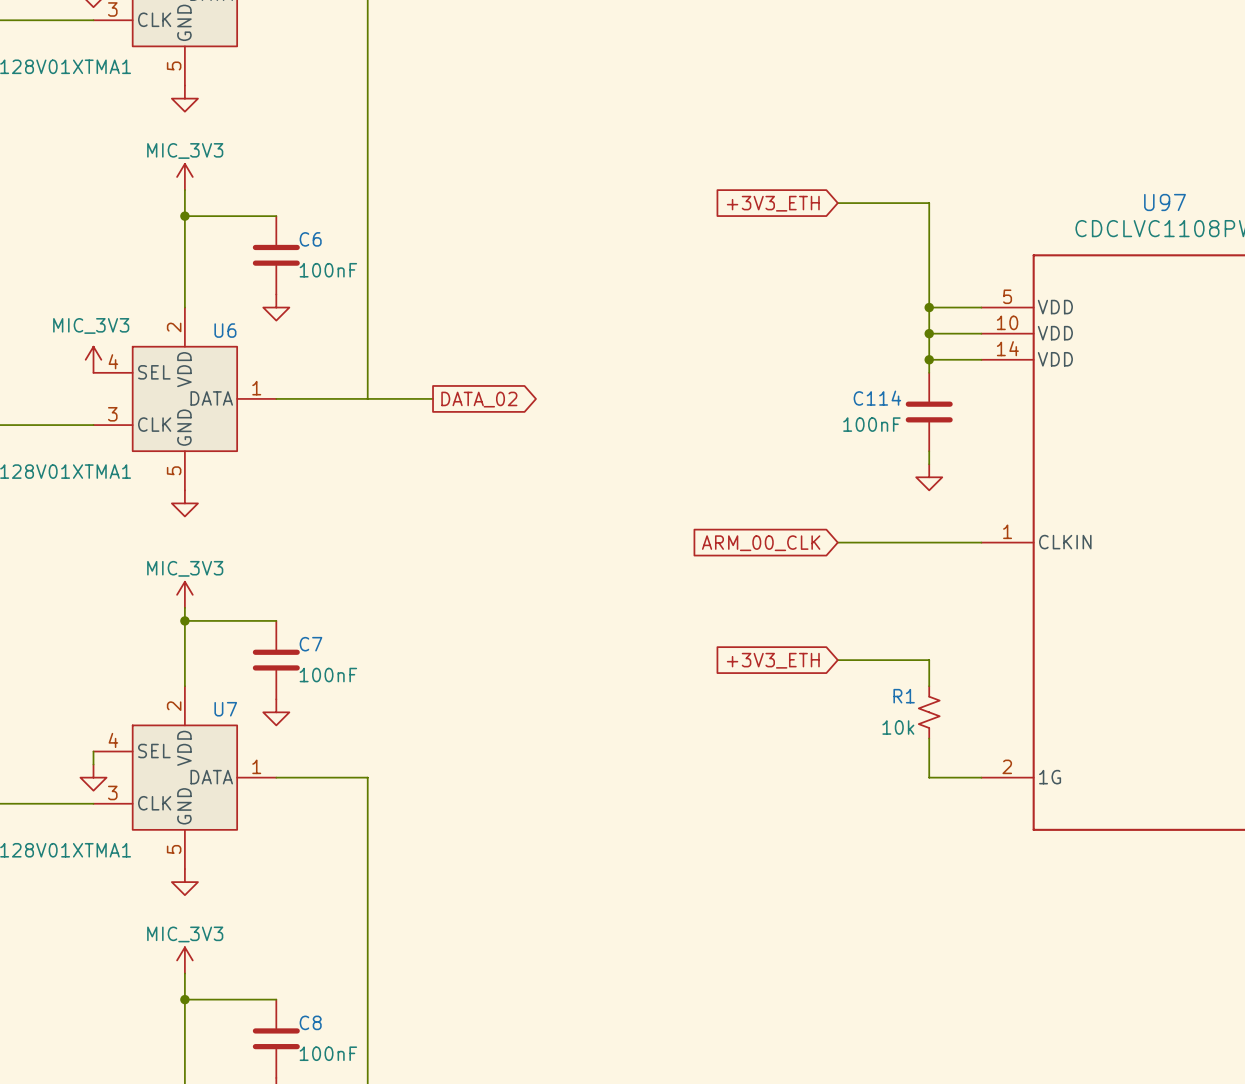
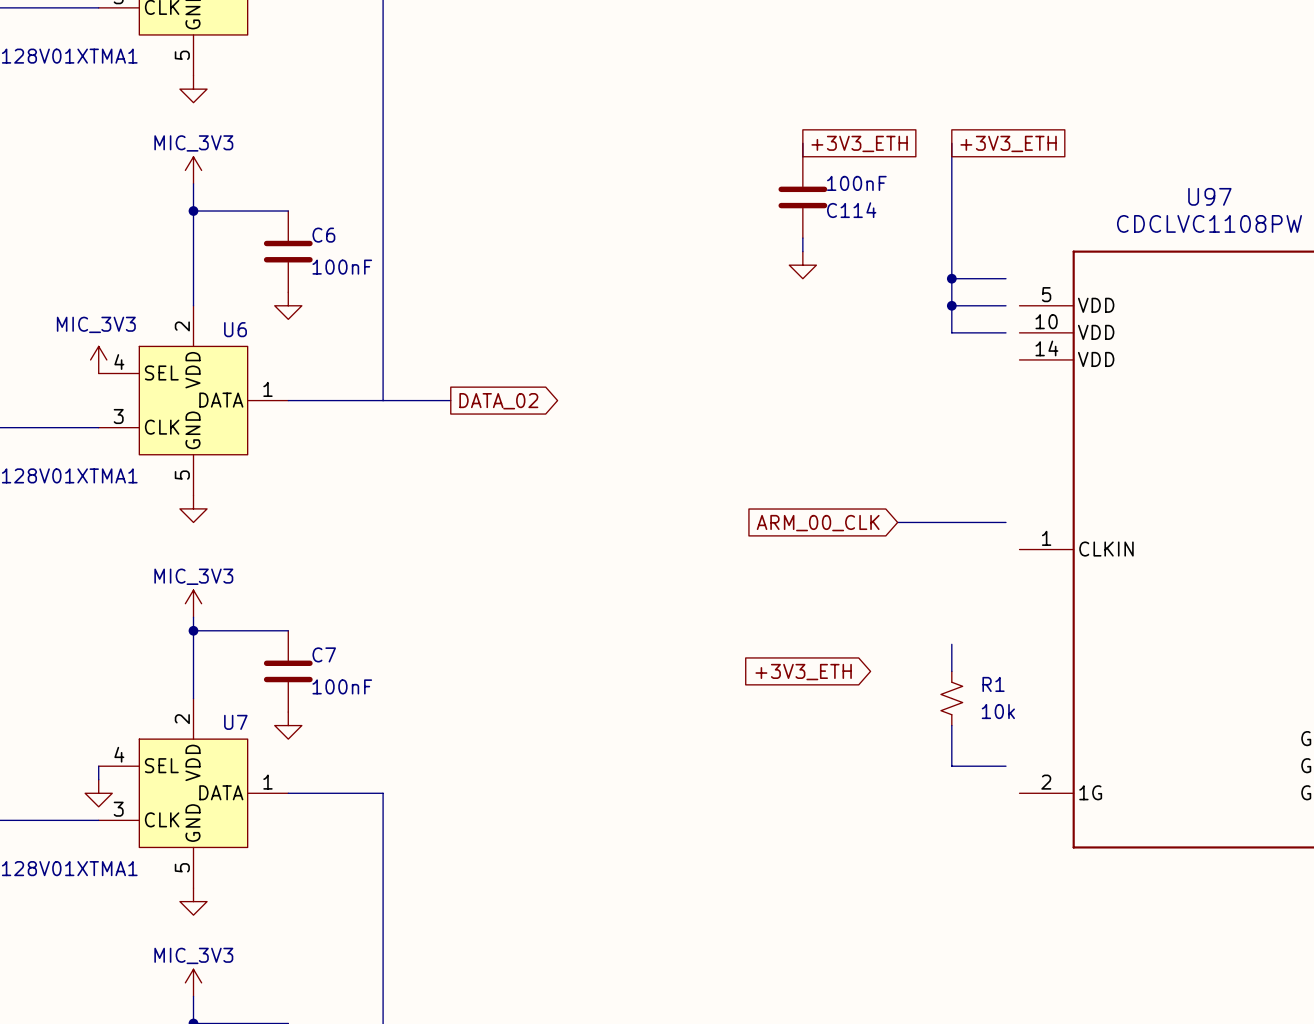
wire: none -> (802, 143) (802, 156)
wire: none -> (951, 143) (951, 332) (965, 332)
global label: none -> +3V3_ETH (859, 143)
global label: none -> +3V3_ETH (1008, 143)
global label: +3V3_ETH (773, 203) -> none
wire: (837, 203) (929, 203) (929, 372) -> none
wire: none -> (802, 238) (802, 251)
power symbol: none -> (802, 265)
junction: none -> (951, 278)
junction position: (929, 307) -> (951, 305)
wire: (968, 307) (981, 307) -> (951, 305) (965, 305)
junction: (929, 333) -> none
wire: (968, 333) (981, 333) -> none
wire: (929, 359) (981, 359) -> (951, 278) (1005, 278)
junction: (929, 359) -> none
C114 name position: C114 (877, 398) -> C114 (851, 210)
C114 position: (929, 412) -> (802, 197)
C114 value position: 100nF (871, 424) -> 100nF (856, 183)
wire: (929, 451) (929, 464) -> none
power symbol: (929, 477) -> none
wire: none -> (897, 522) (1005, 522)
wire: (837, 542) (981, 542) -> none
global label position: ARM_00_CLK (761, 543) -> ARM_00_CLK (818, 523)
wire: none -> (951, 644) (951, 671)
wire: (837, 660) (929, 660) (929, 686) -> none
R1 name position: R1 (904, 696) -> R1 (993, 684)
R1 position: (929, 712) -> (951, 698)
R1 value position: 10k (898, 727) -> 10k (998, 711)
wire: (929, 738) (929, 777) (981, 777) -> (951, 725) (951, 766) (1005, 766)

